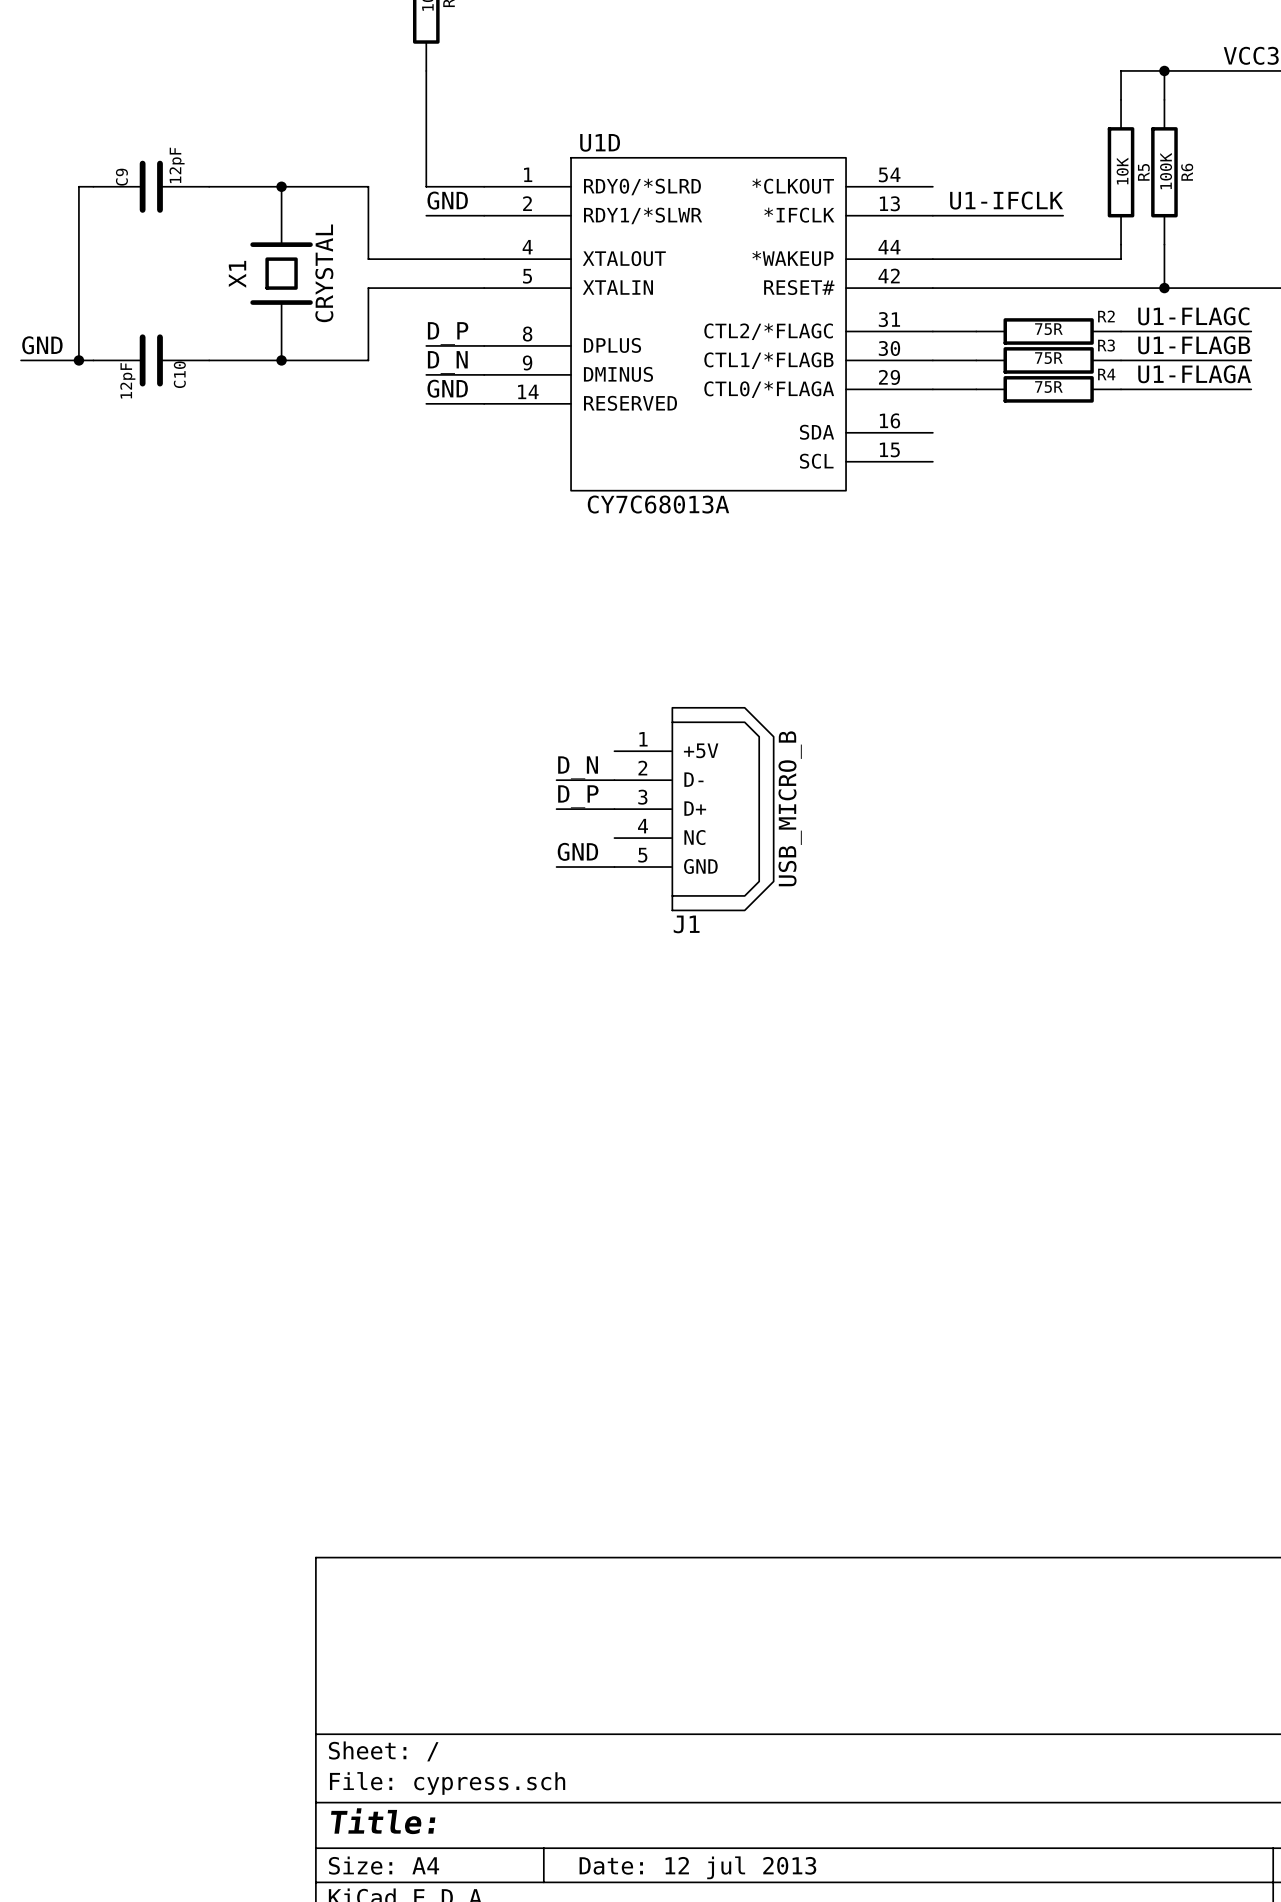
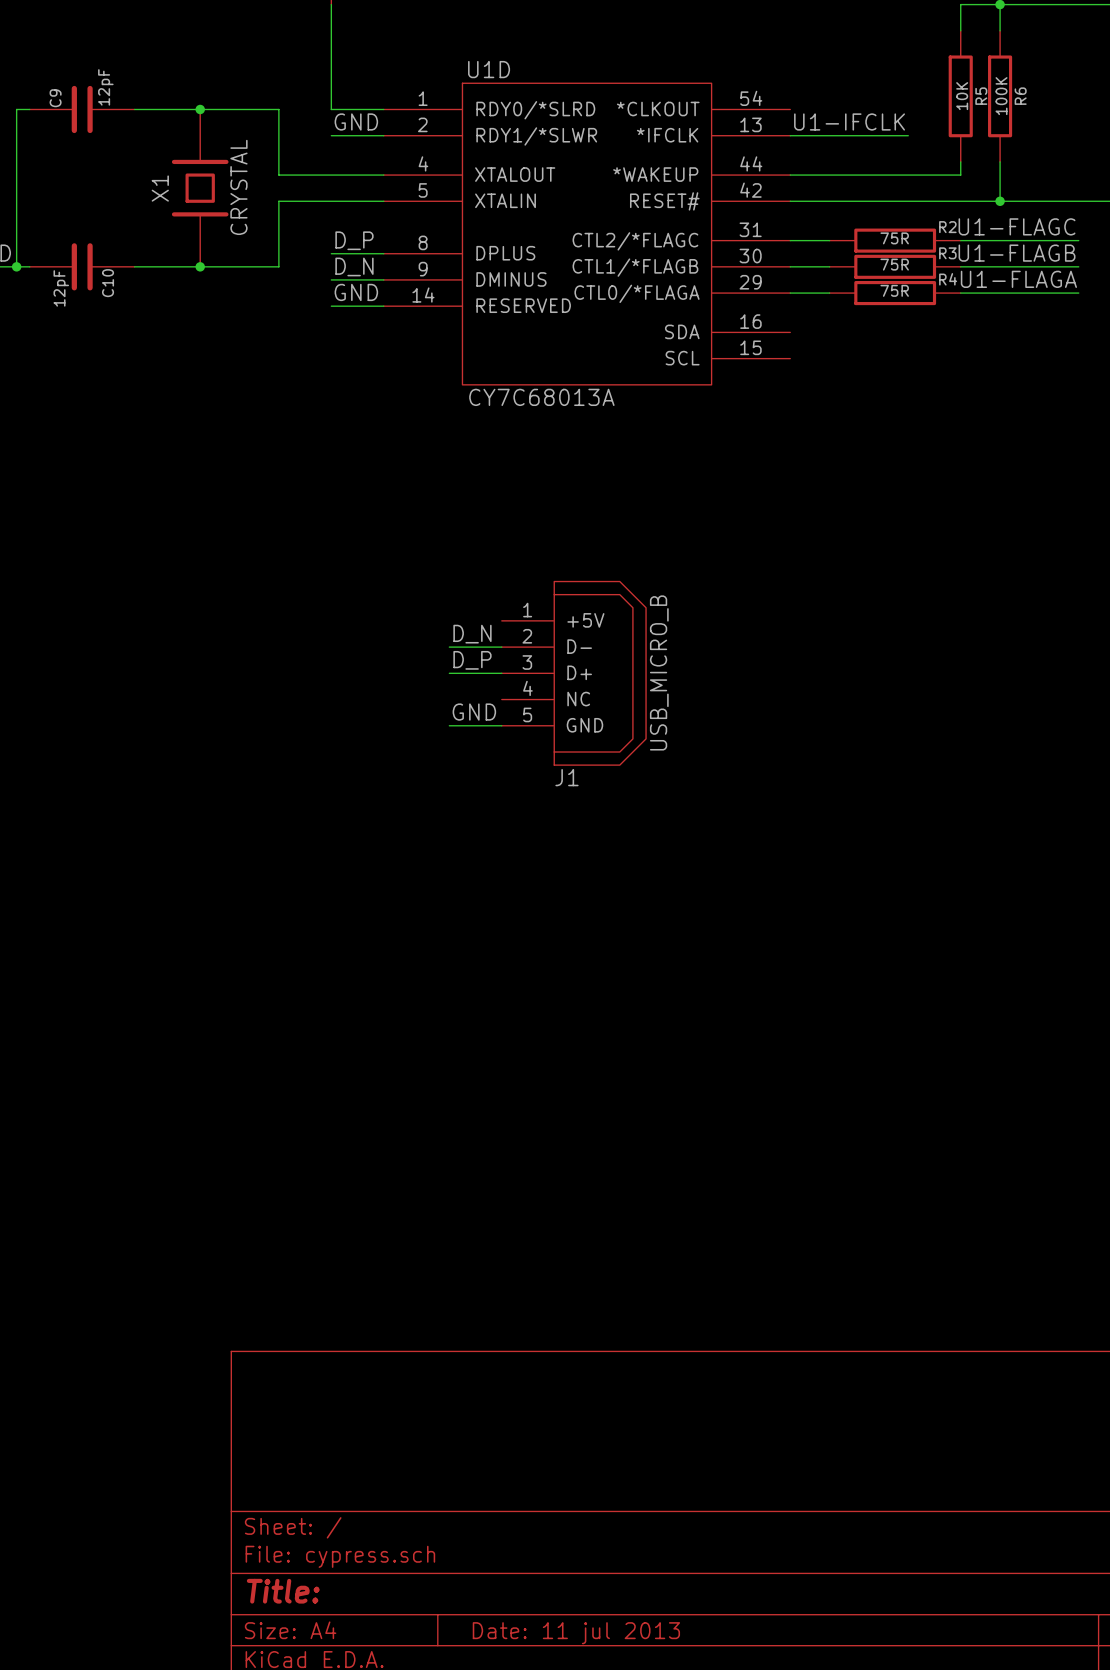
title block: Date: 12 jul 2013 (697, 1867) -> Date: 11 jul 2013 (576, 1633)

